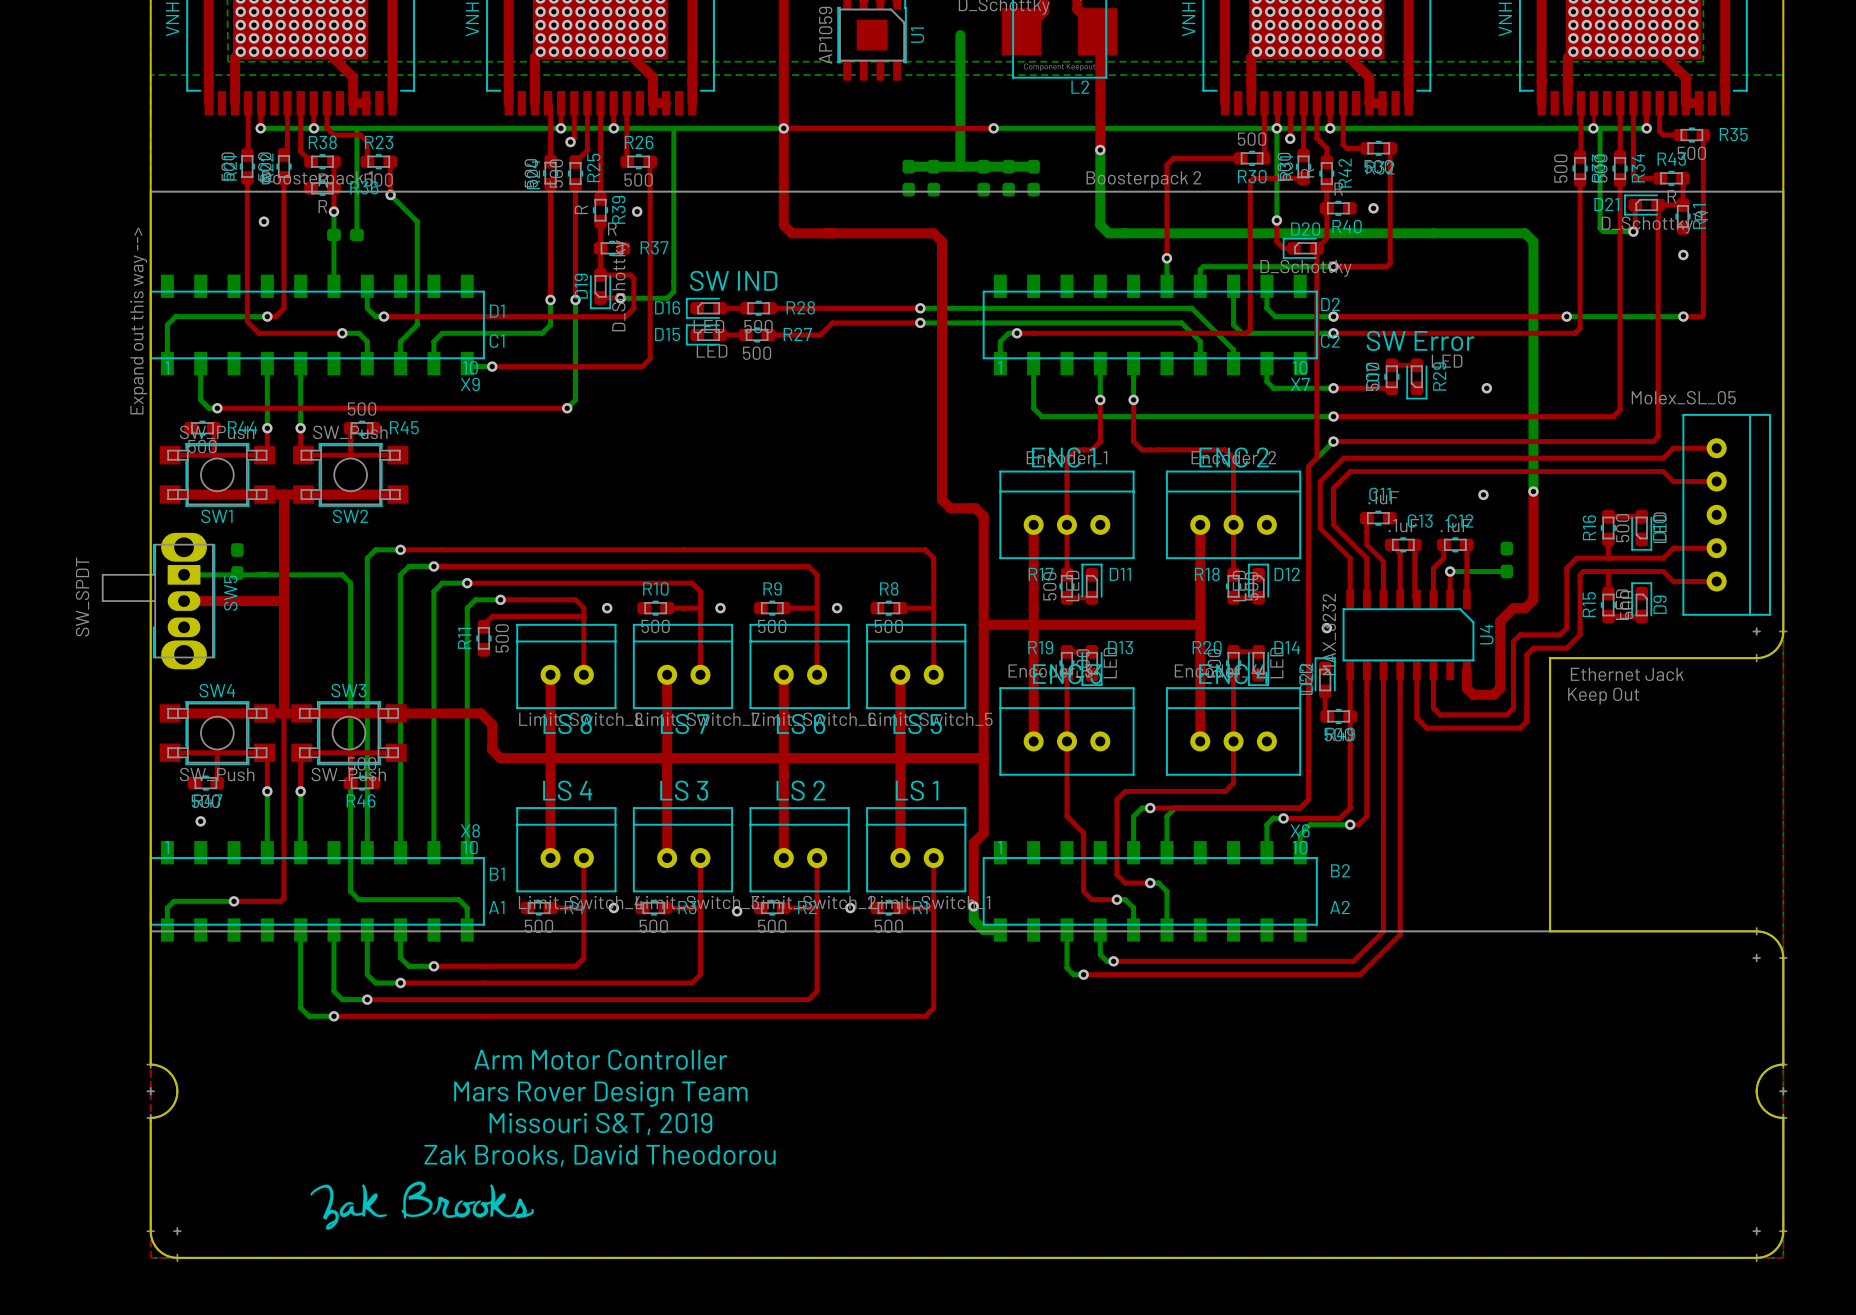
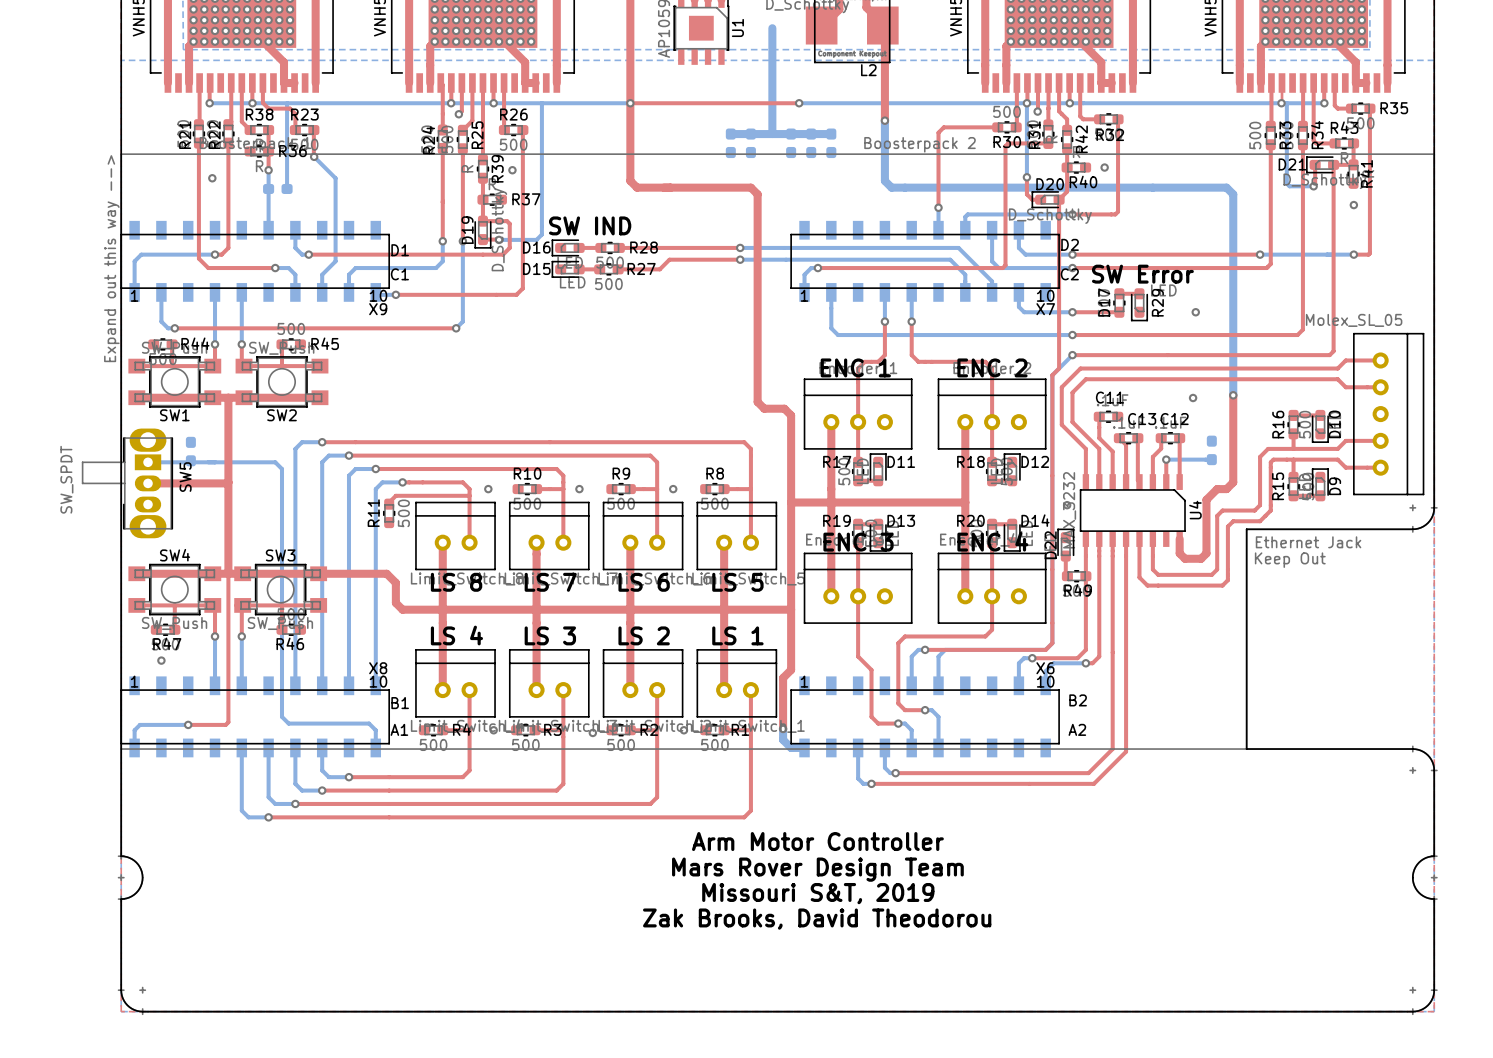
text: none -> Arm Motor Controller (817, 841)
text: Arm Motor Controller (600, 1059) -> none
text: none -> Mars Rover Design Team (817, 869)
text: Mars Rover Design Team (600, 1094) -> none
text: none -> Missouri S&T, 2019 (818, 893)
text: Missouri S&T, 2019 (600, 1124) -> none
text: none -> Zak Brooks, David Theodorou (817, 919)
text: Zak Brooks, David Theodorou (600, 1155) -> none
drawing: [310, 1181, 534, 1230] -> none

